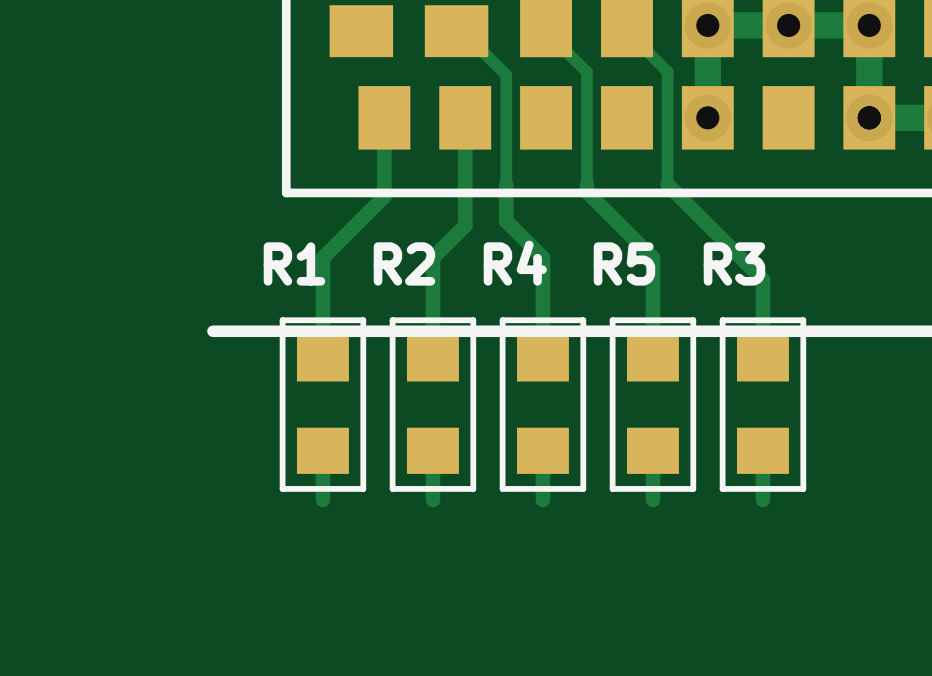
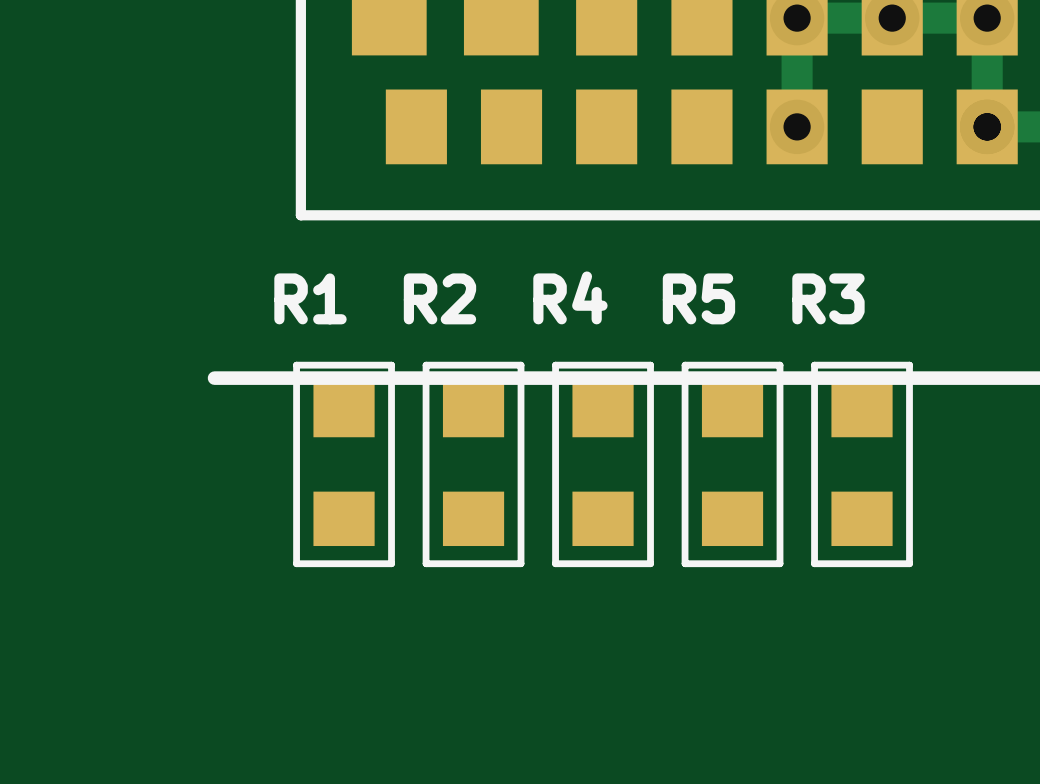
track: (546, 25) (546, 31) (586, 72) (586, 191) (652, 257) (652, 358) -> none
track: (627, 25) (627, 31) (667, 71) (667, 184) (762, 279) (762, 358) -> none
track: (456, 31) (462, 31) (506, 75) (506, 221) (542, 257) (542, 358) -> none
track: (384, 117) (384, 196) (322, 257) (322, 358) -> none
track: (465, 117) (465, 225) (432, 257) (432, 358) -> none
track: (322, 450) (322, 499) -> none
track: (432, 450) (432, 499) -> none
track: (542, 450) (542, 499) -> none
track: (652, 450) (652, 499) -> none
track: (762, 450) (762, 499) -> none

